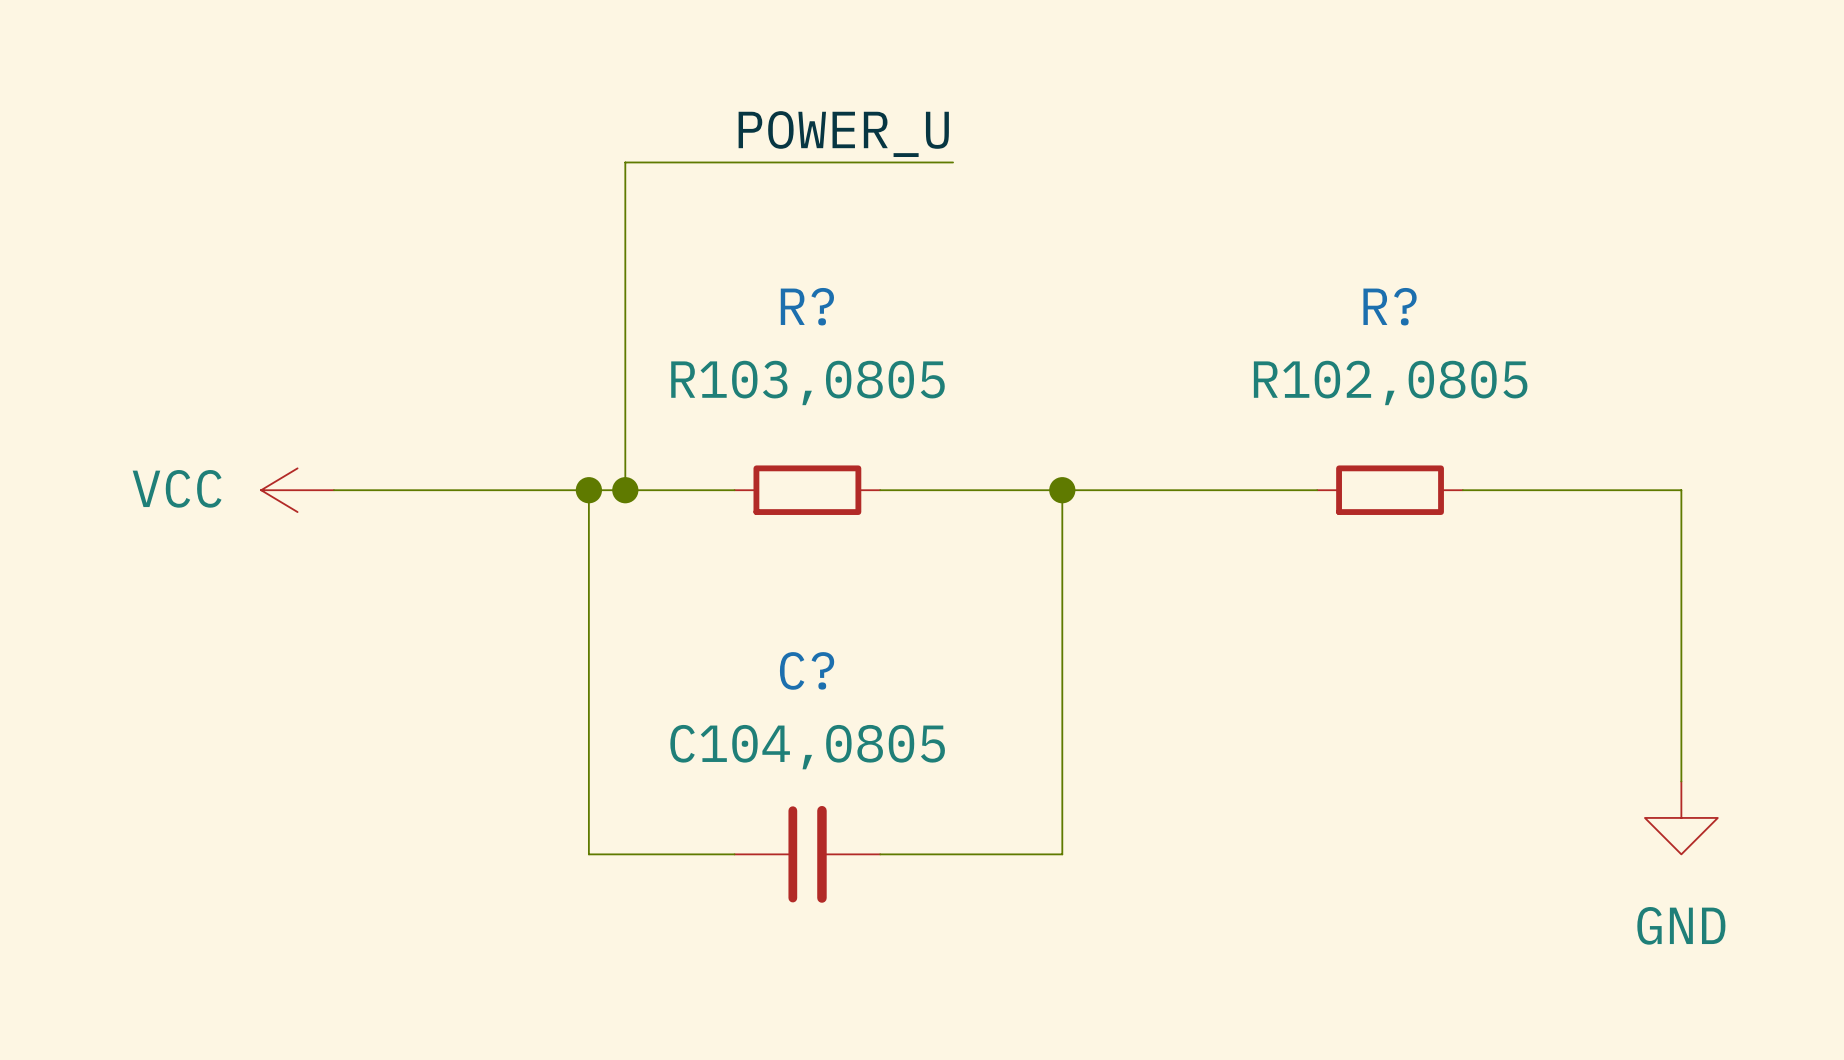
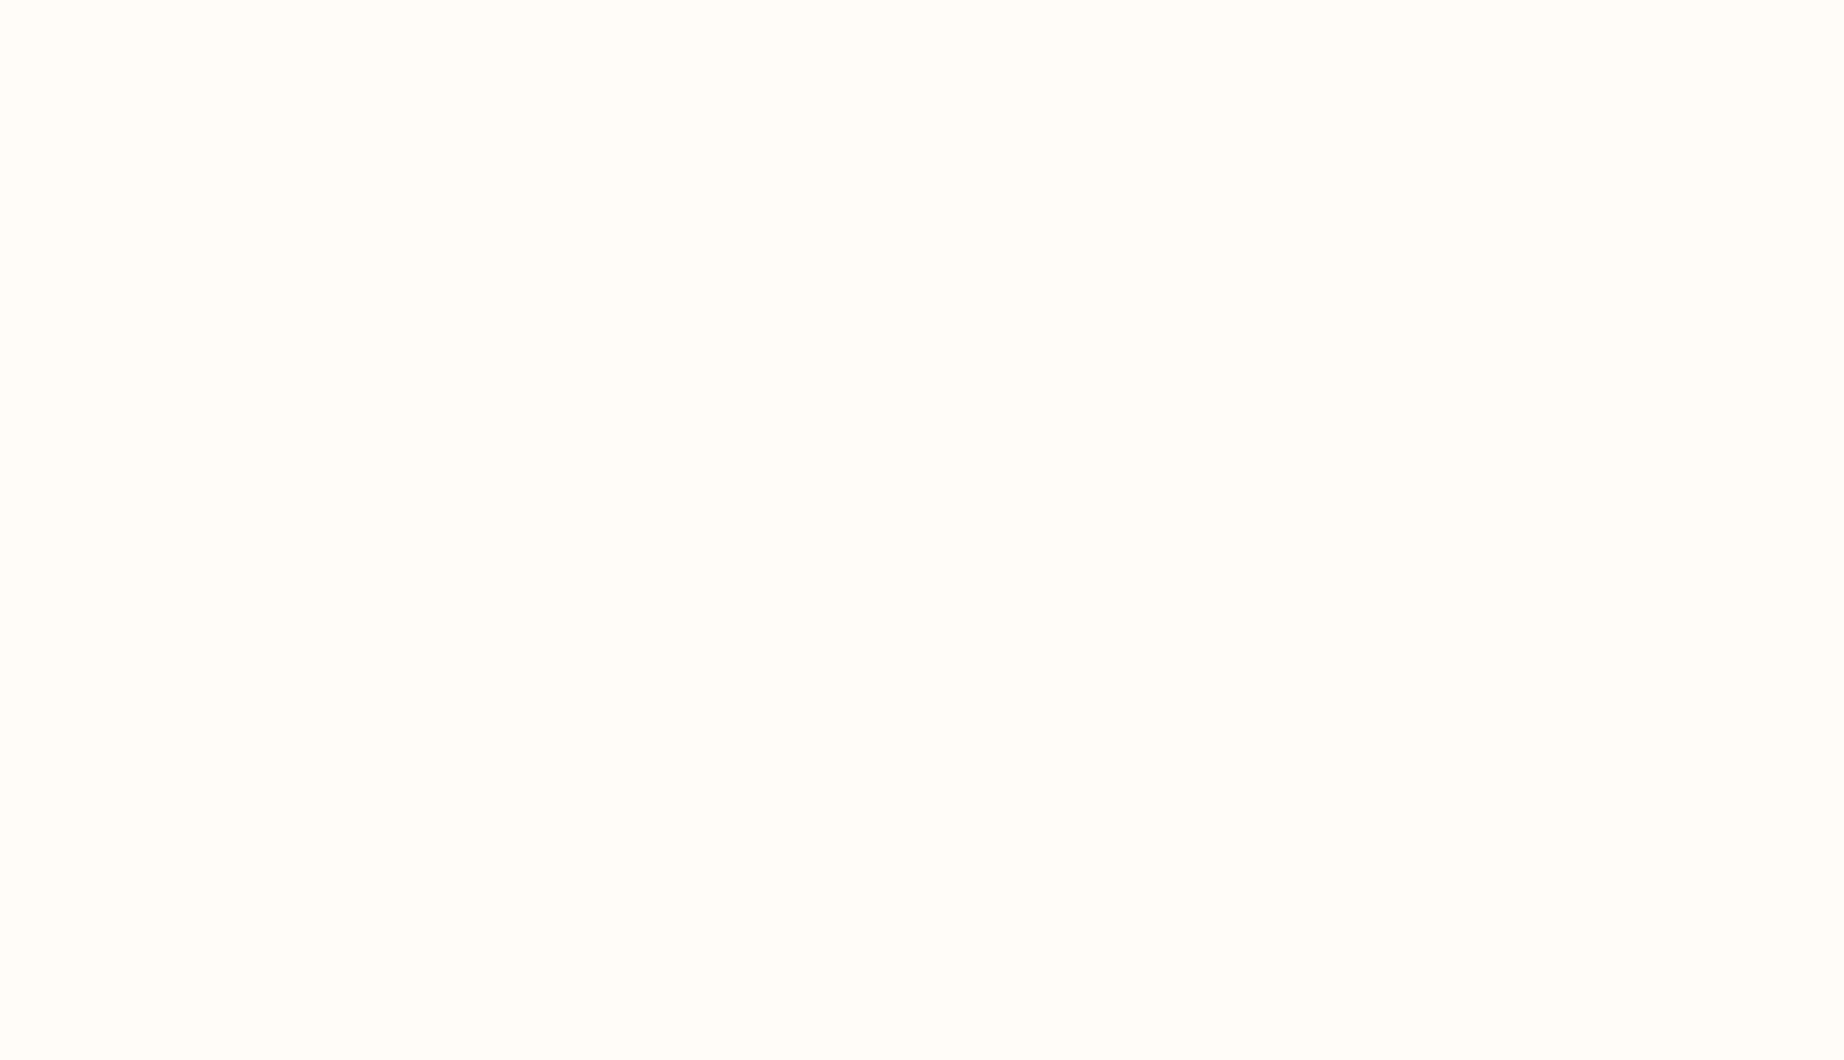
label: POWER_U (843, 134) -> none
wire: (953, 162) (625, 162) (625, 490) -> none
power symbol: VCC (297, 490) -> none
wire: (333, 490) (734, 490) -> none
wire: (588, 490) (588, 854) (734, 854) -> none
junction: (588, 490) -> none
junction: (625, 490) -> none
R?: R103,0805 (807, 490) -> none
wire: (880, 490) (1317, 490) -> none
wire: (1062, 490) (1062, 854) (880, 854) -> none
junction: (1062, 490) -> none
R?: R102,0805 (1390, 490) -> none
wire: (1462, 490) (1681, 490) (1681, 781) -> none
power symbol: GND (1681, 817) -> none
C?: C104,0805 (807, 854) -> none

